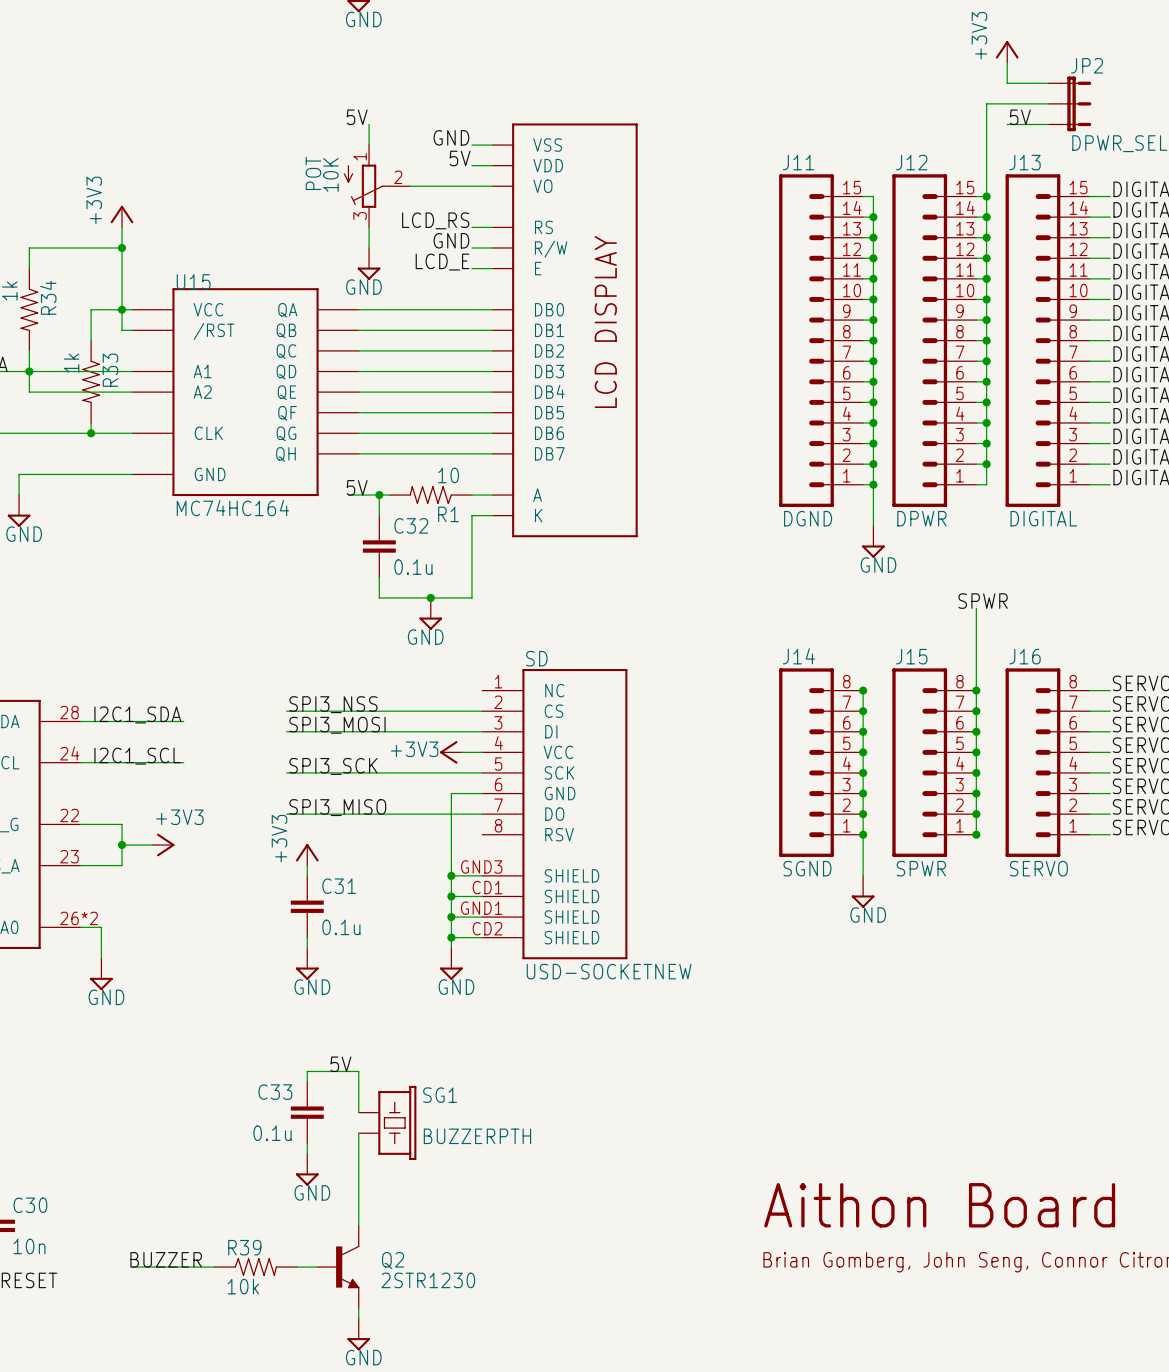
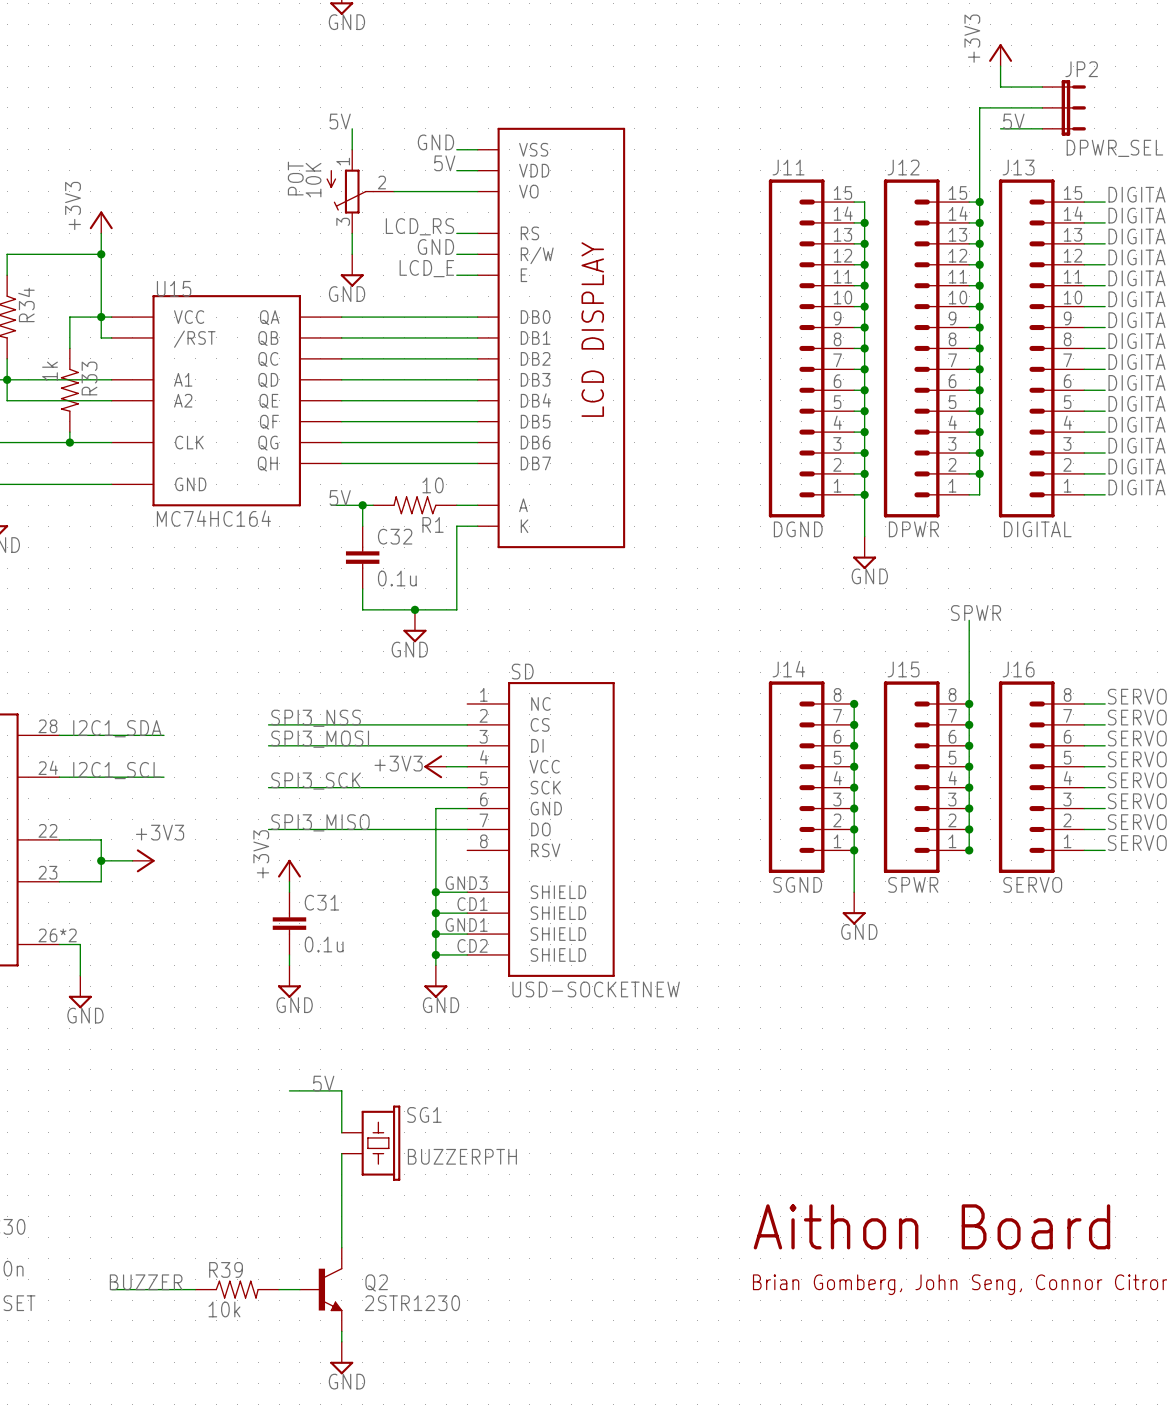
wire: (307, 1071) (307, 1081) -> none
C33: 0.1u (307, 1112) -> none
wire: (307, 1143) (307, 1153) -> none
power symbol: GND (307, 1169) -> none

